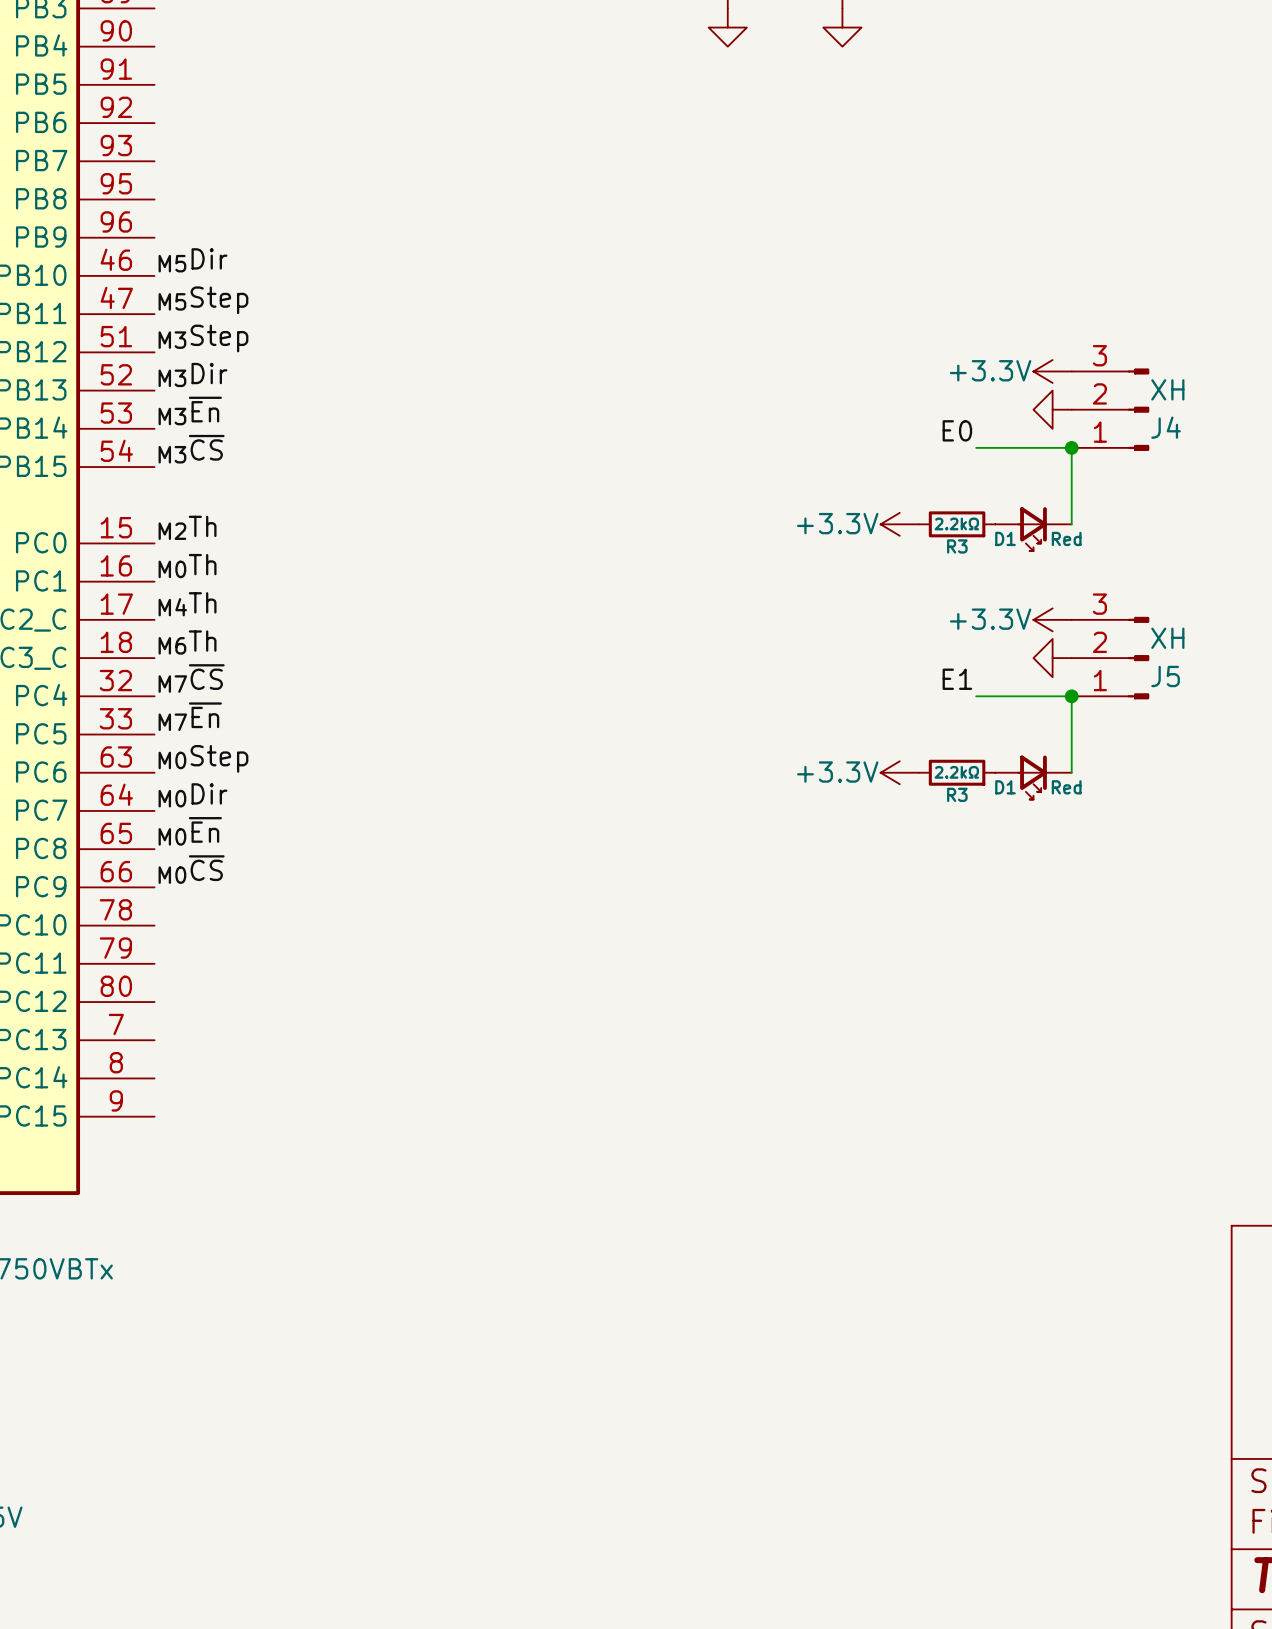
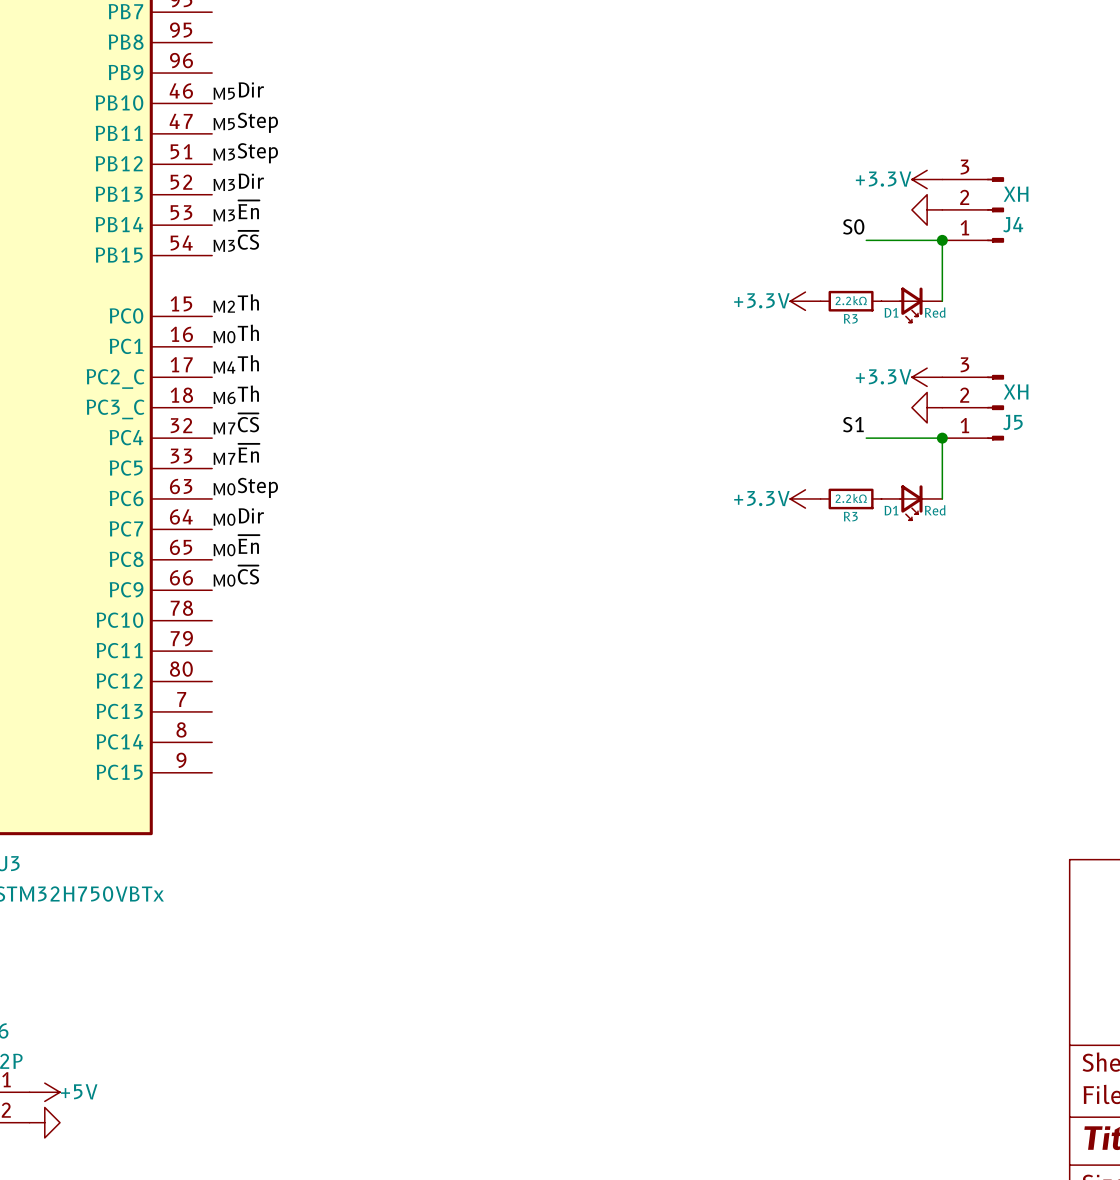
label: E0 (957, 430) -> S0 (853, 226)
label: E1 (957, 679) -> S1 (853, 424)

